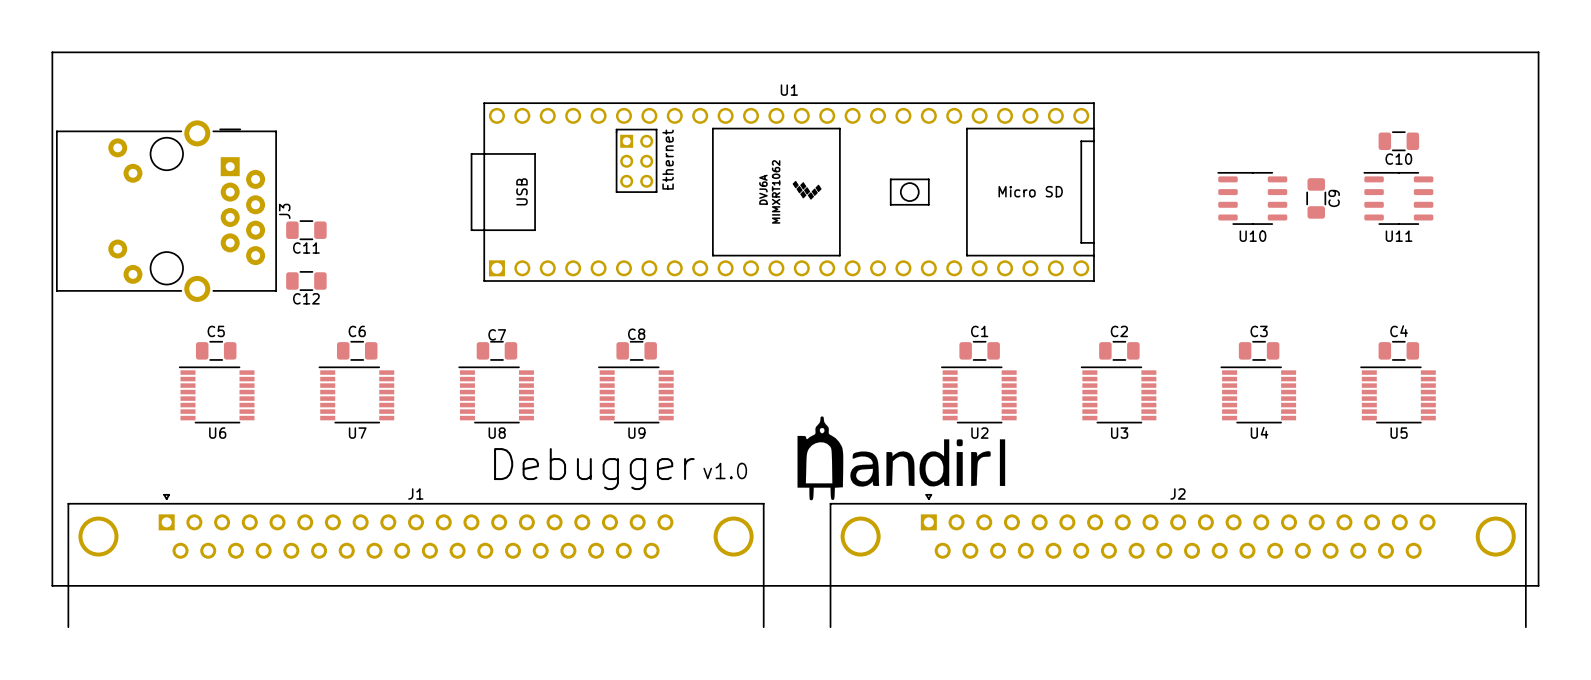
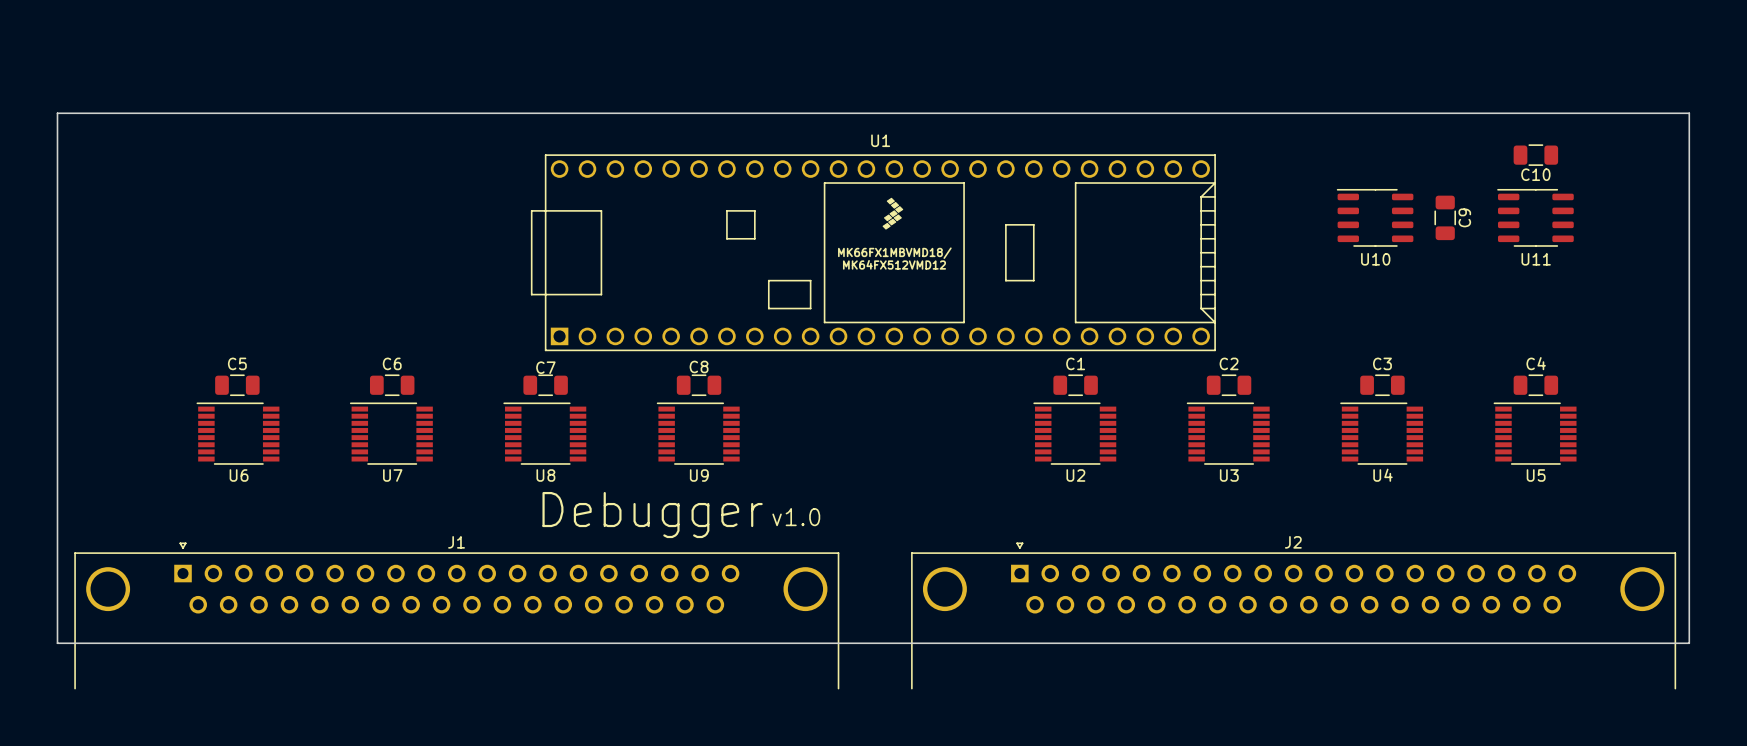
U1 footprint: [470, 102, 1095, 282] -> [530, 154, 1216, 352]
board edge: (52, 103) (52, 52) (1538, 52) (1538, 103) -> (57, 113) (1689, 113)
J3: (166, 211) -> none
C11: (306, 230) -> none
C12: (306, 281) -> none
drawing: [797, 416, 1006, 501] -> none

